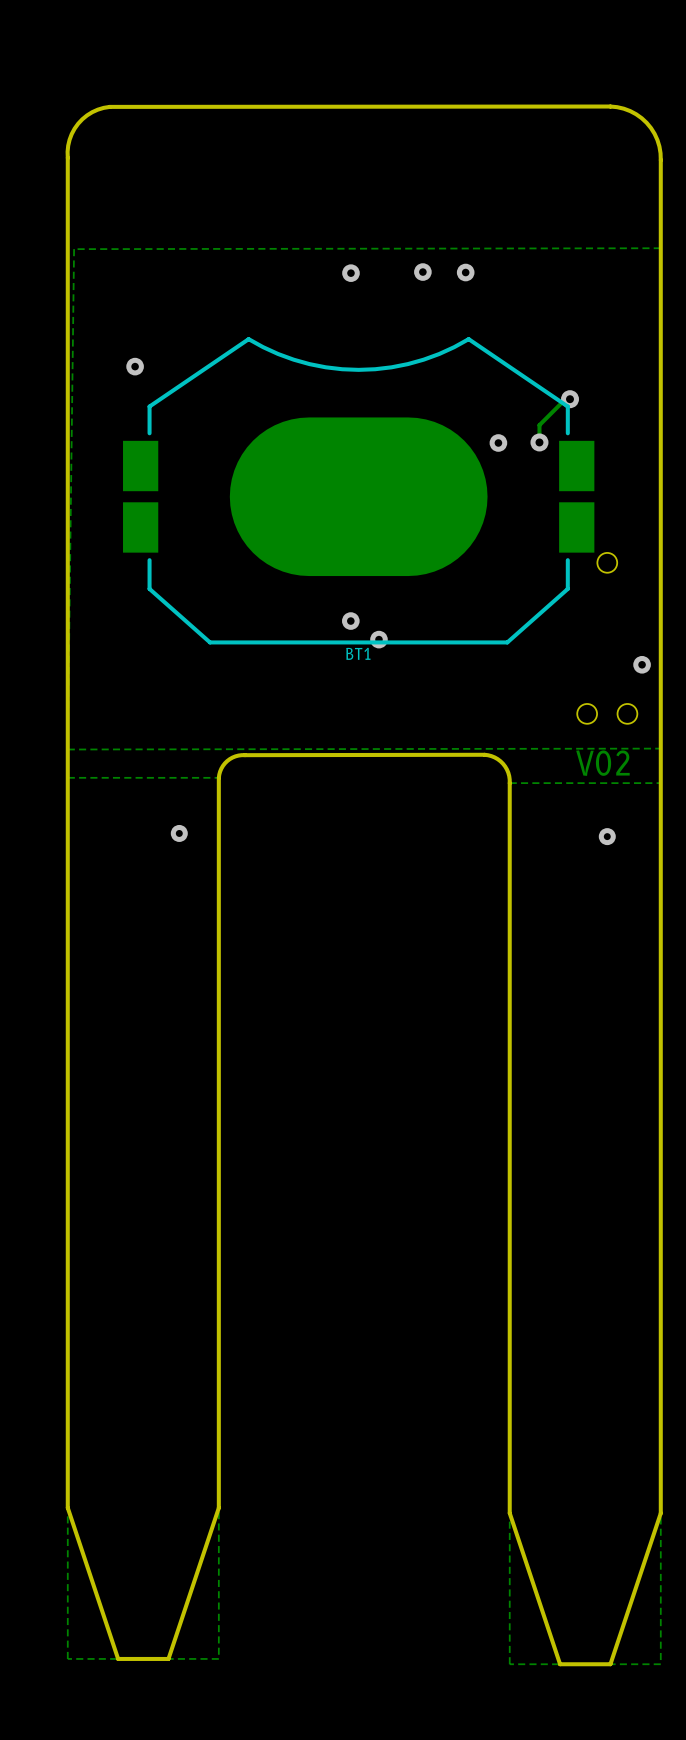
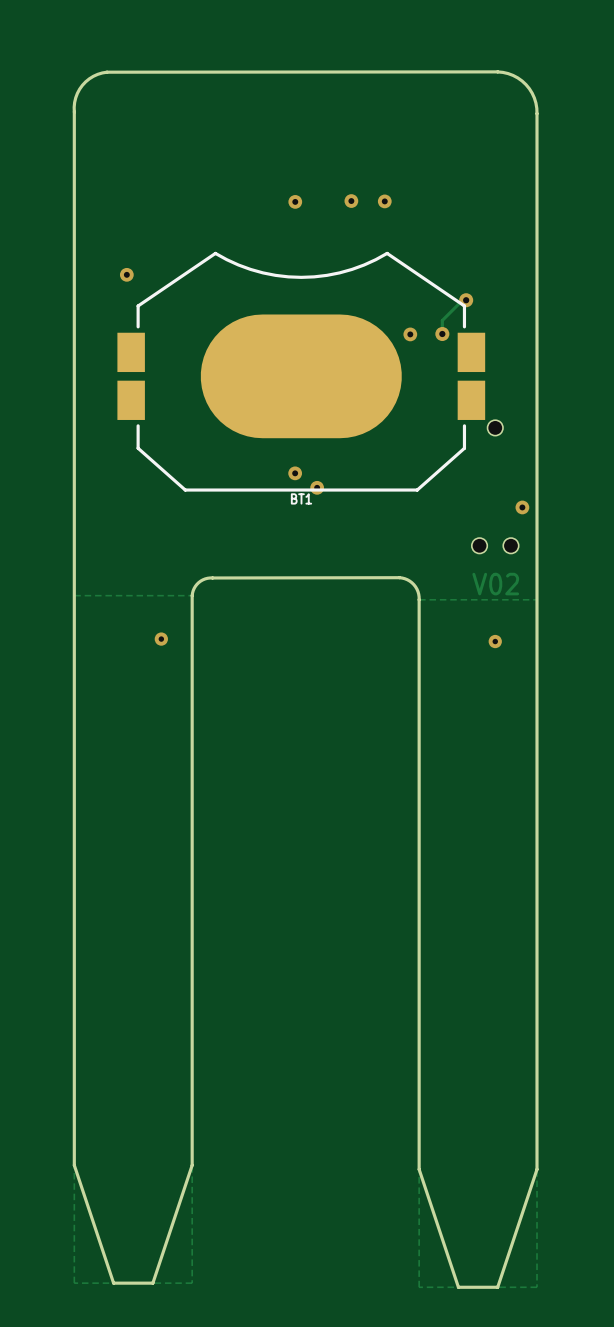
zone outline: (660, 248) (74, 249) (67, 749) (660, 748) (660, 751) (660, 248) -> none

